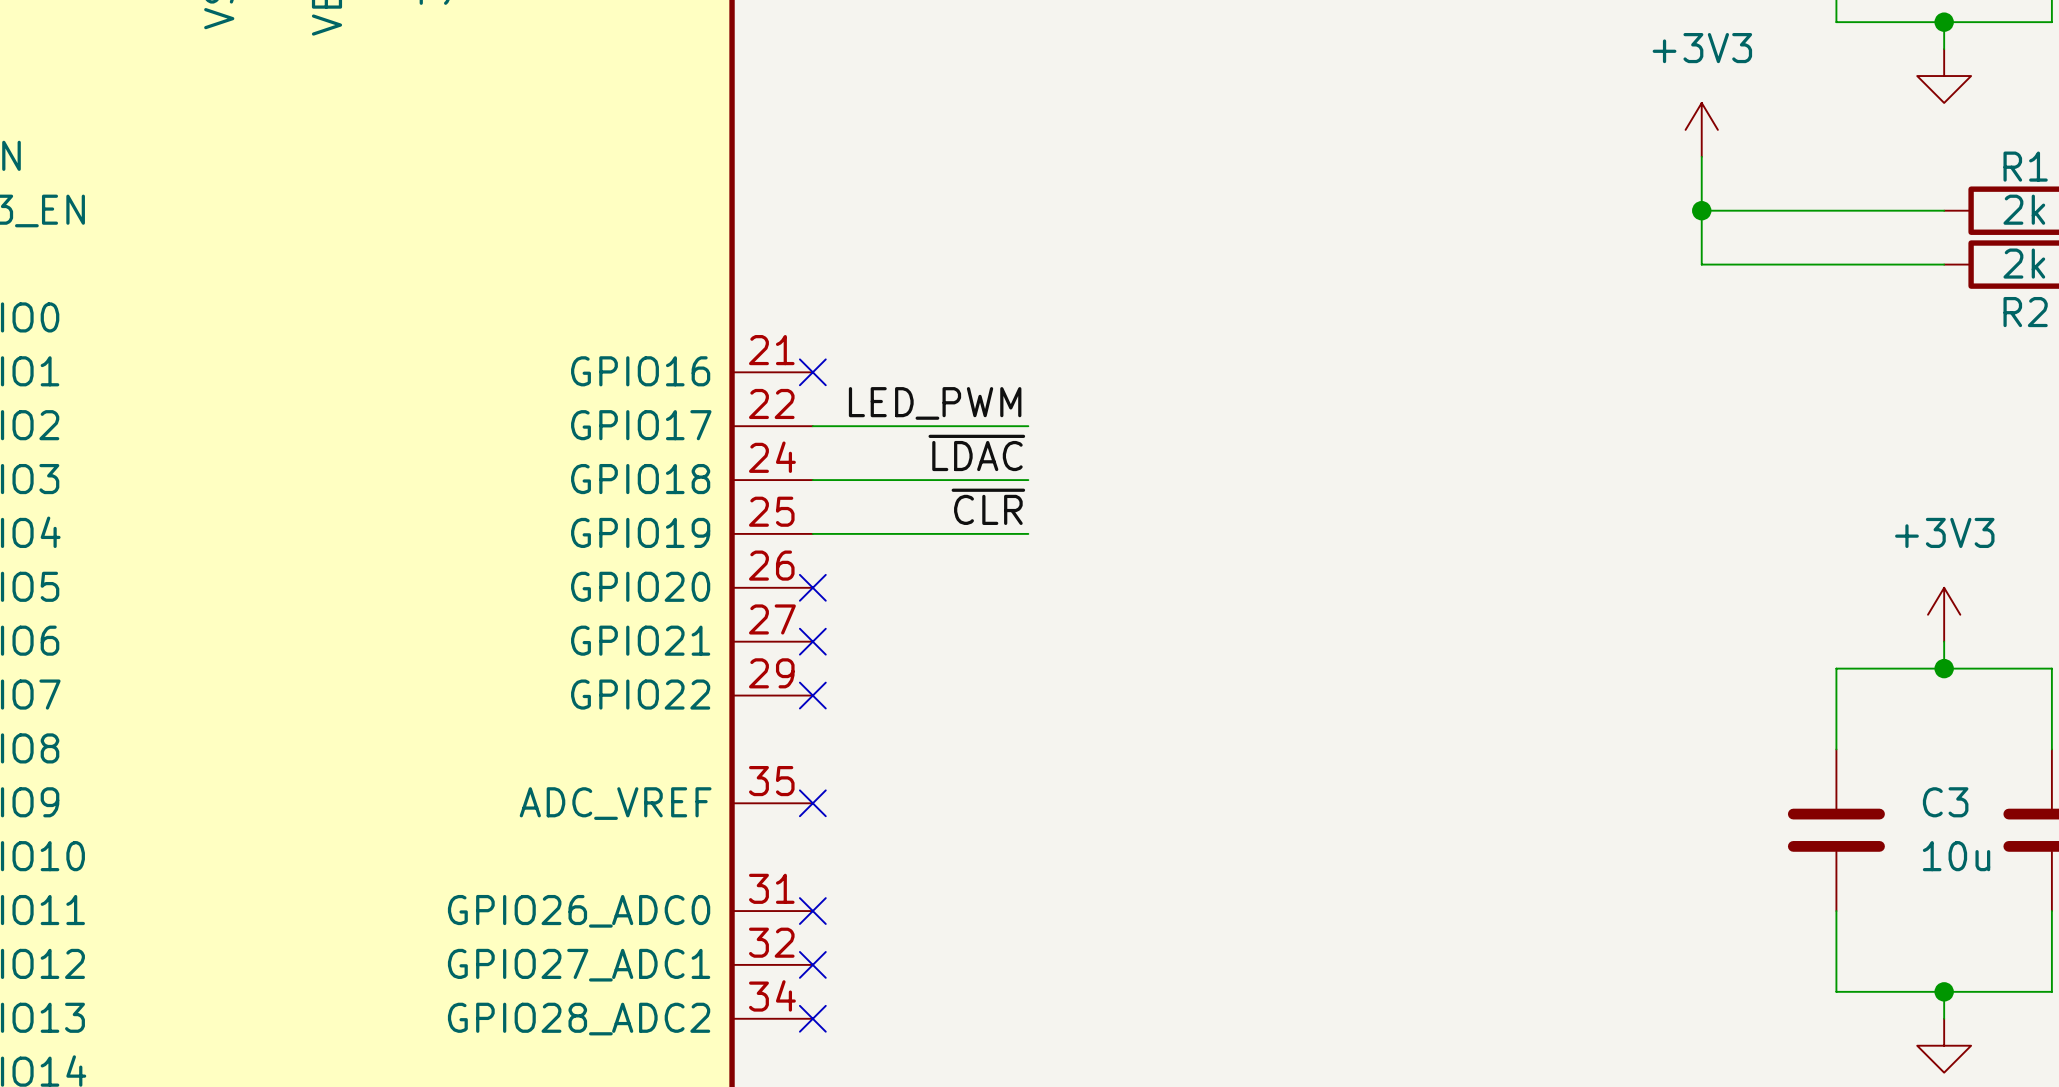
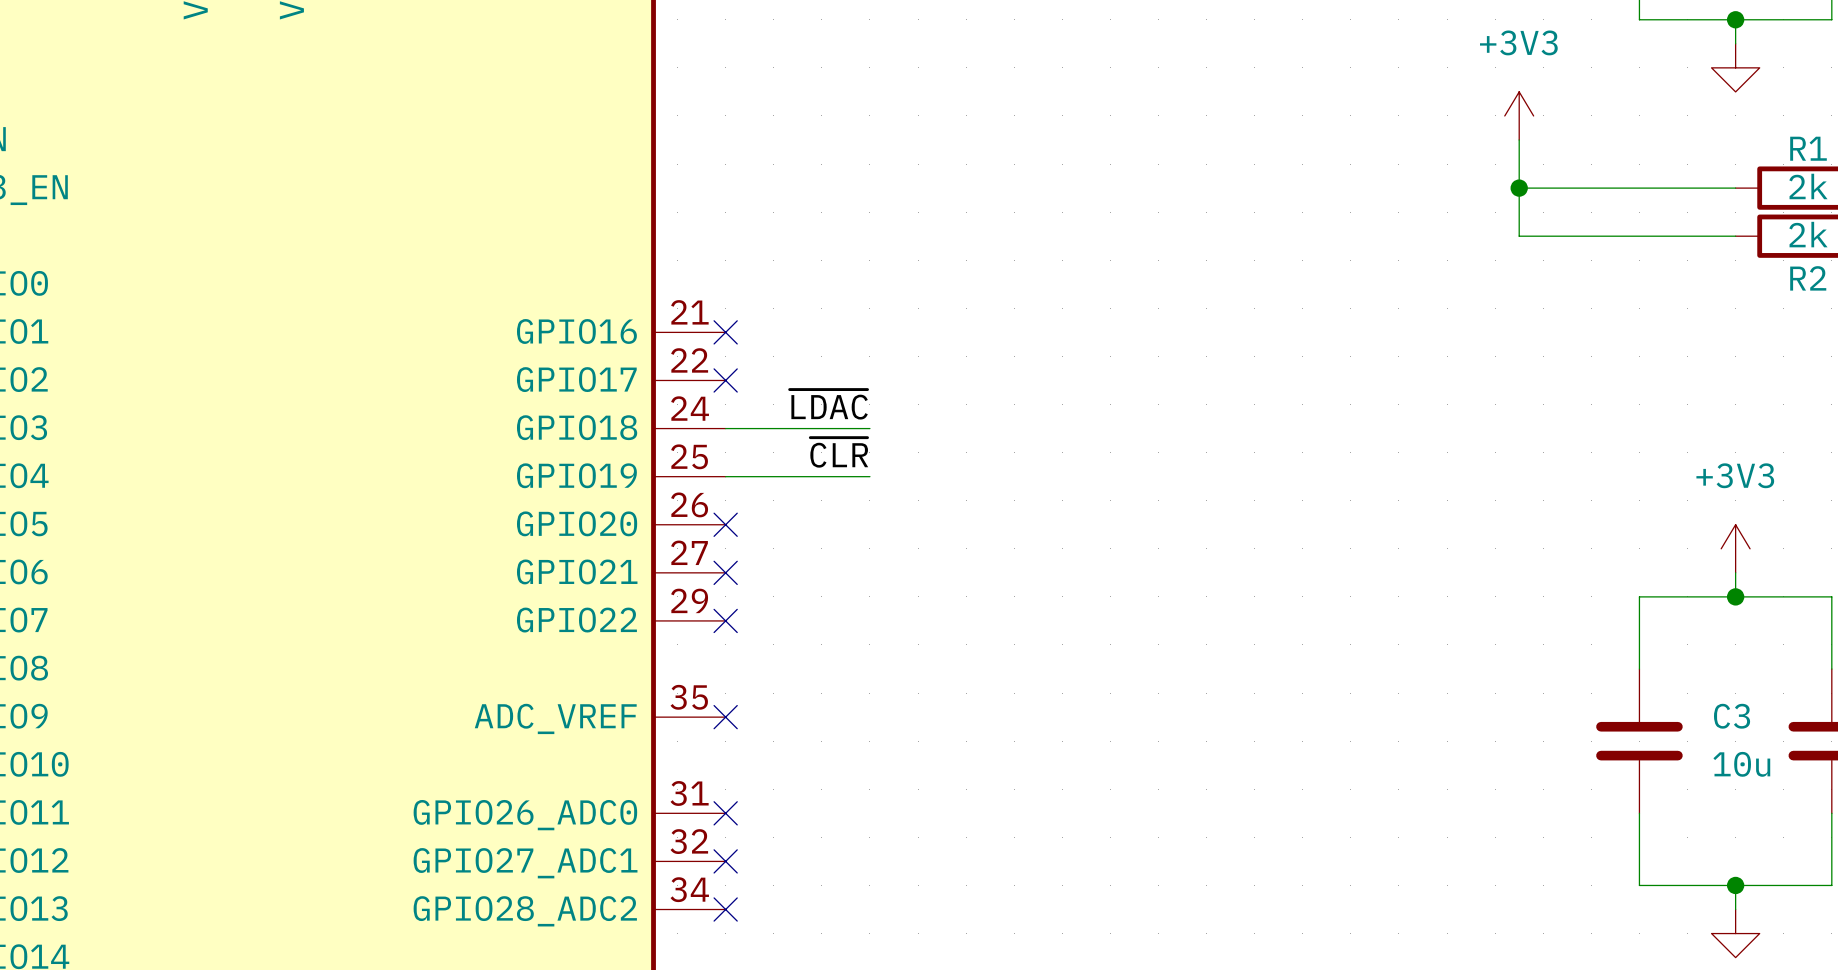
label: LED_PWM (935, 403) -> none
wire: (812, 426) (1028, 426) -> none
no-connect mark: none -> (725, 380)
label position: ~{LDAC} (976, 452) -> ~{LDAC} (828, 404)
wire: (974, 480) (1028, 480) -> none
label position: ~{CLR} (988, 506) -> ~{CLR} (839, 452)
wire: (974, 533) (1028, 533) -> none

